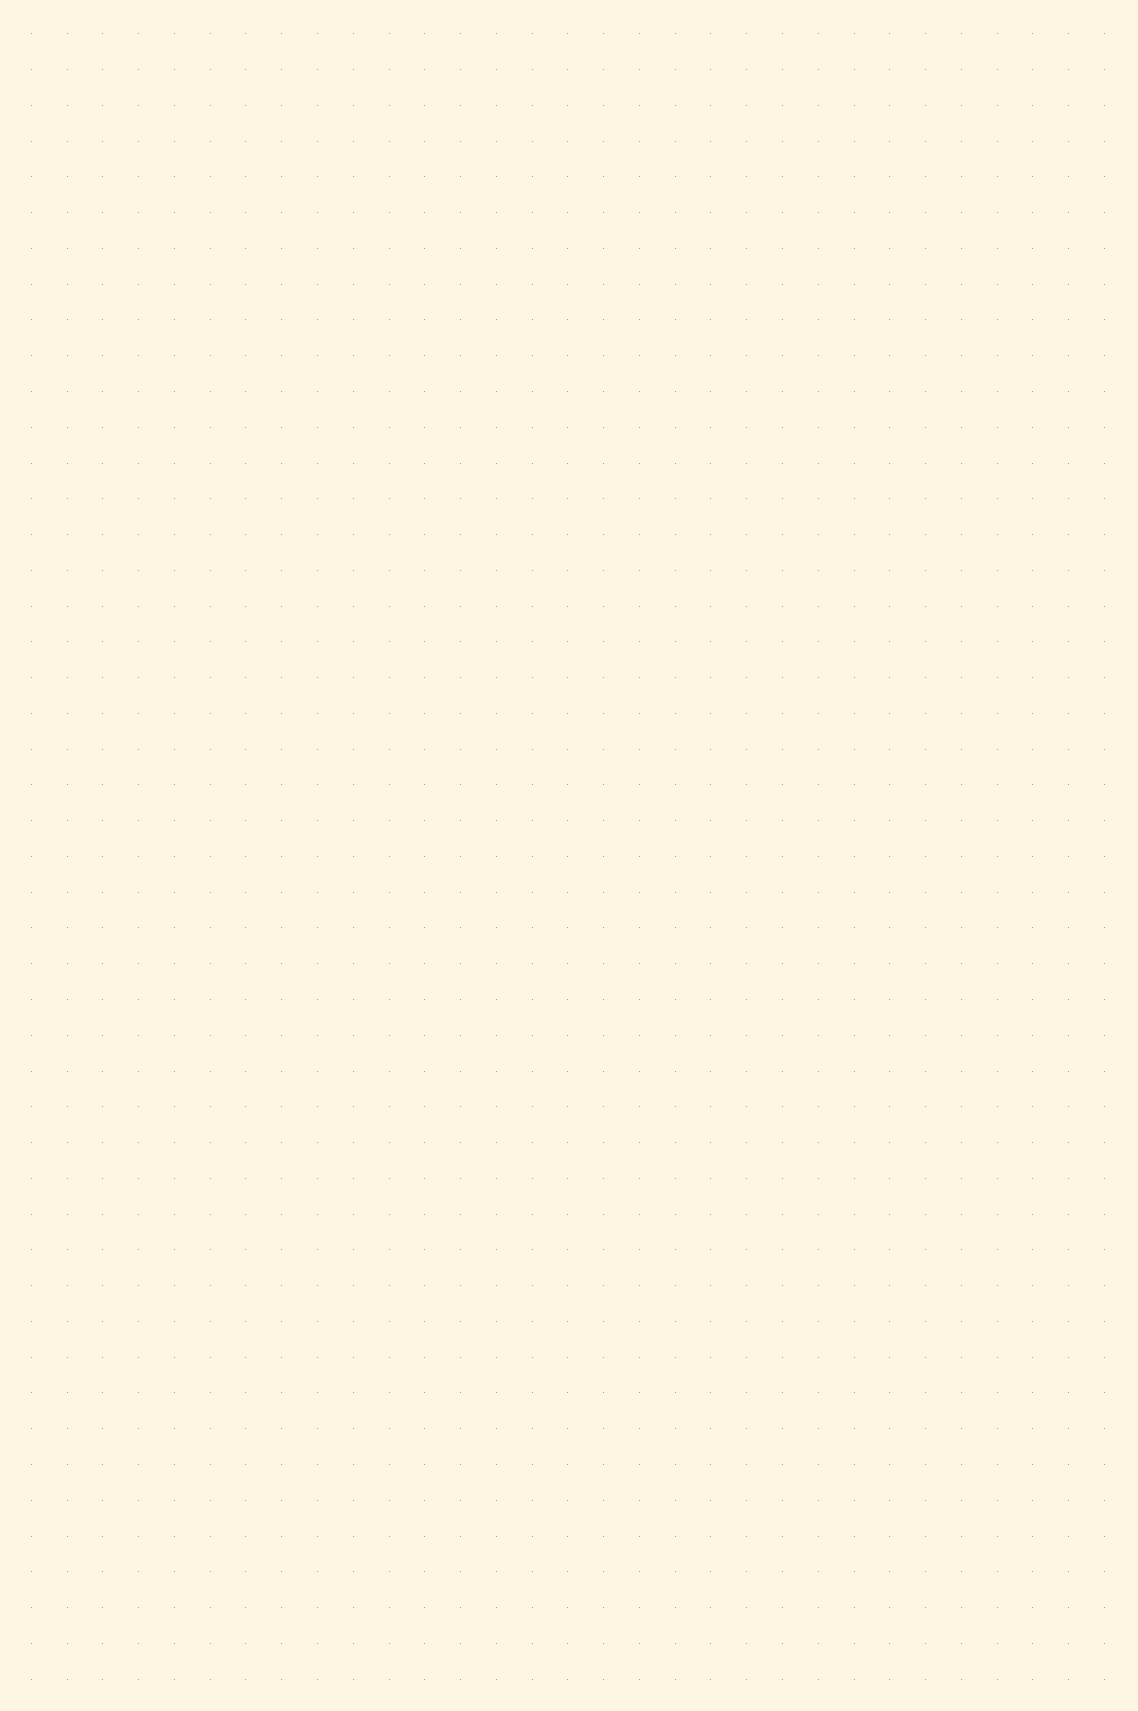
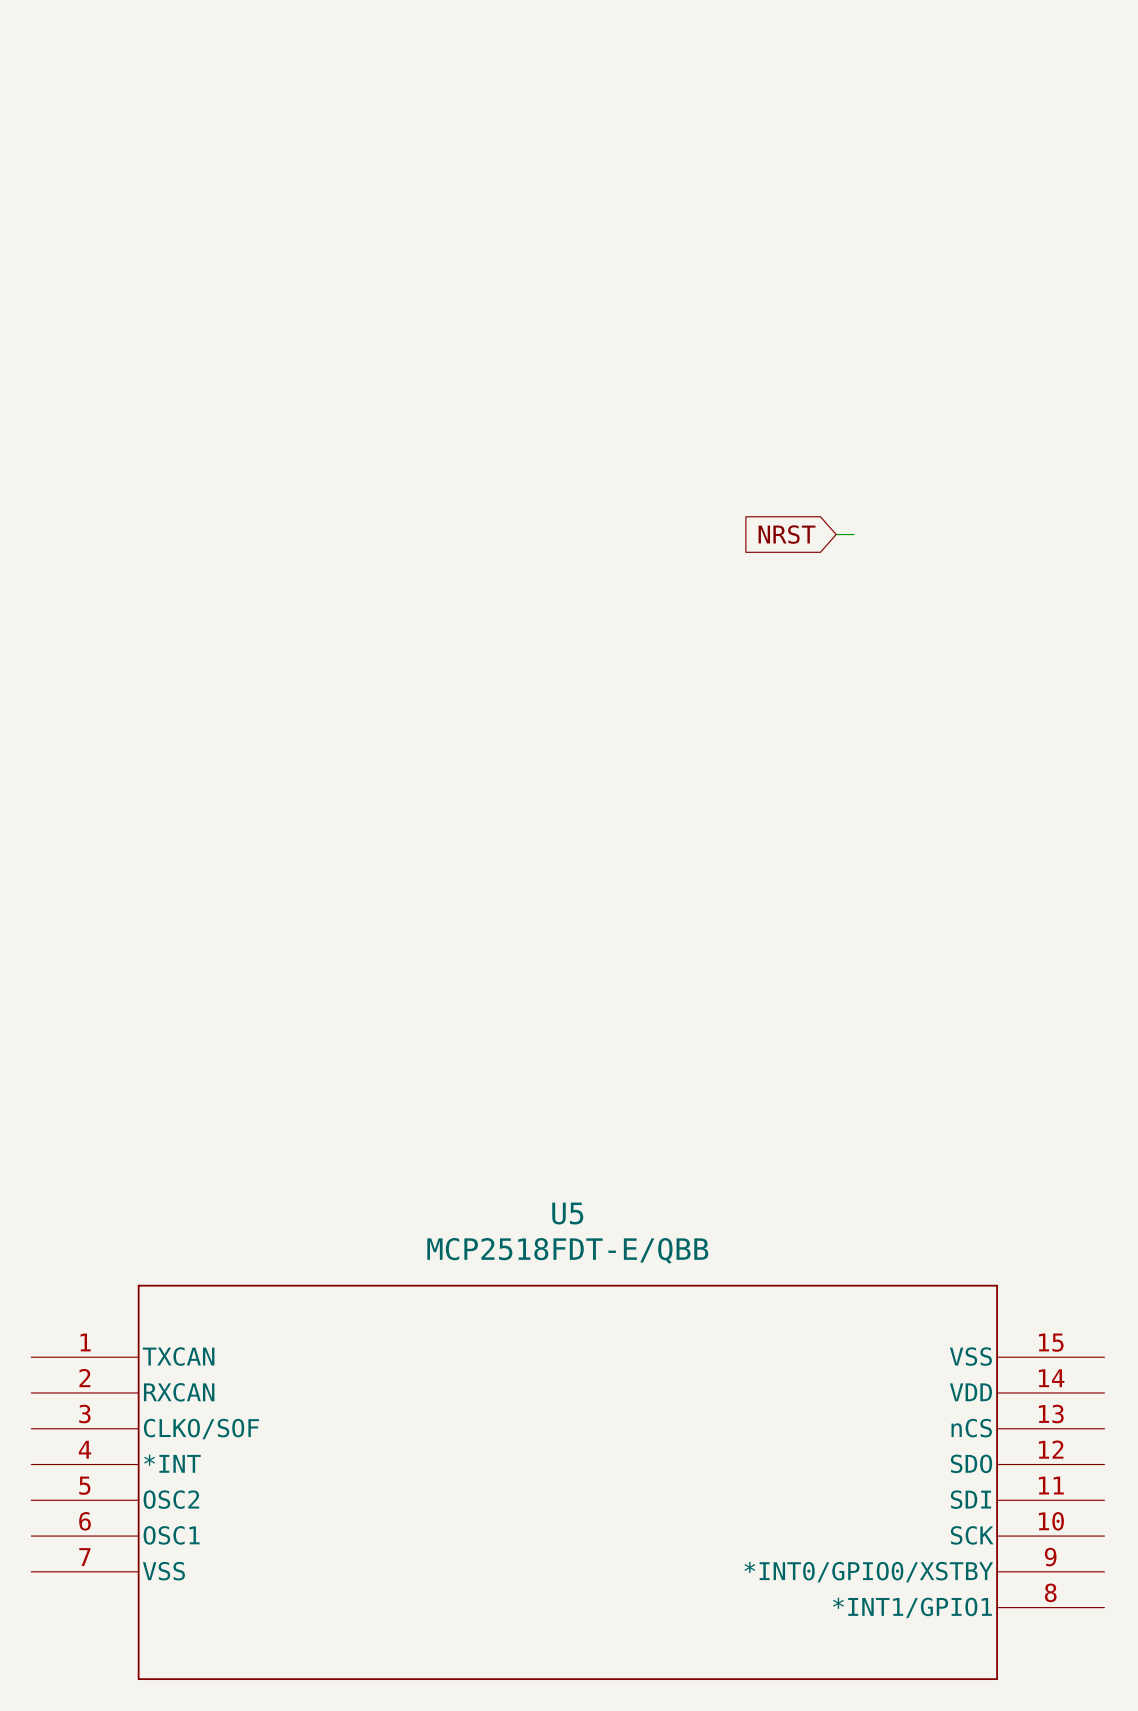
global label: none -> NRST (787, 534)
wire: none -> (836, 534) (854, 534)
U5: none -> MCP2518FDT-E/QBB (567, 1482)

